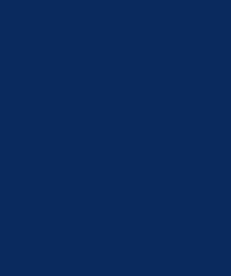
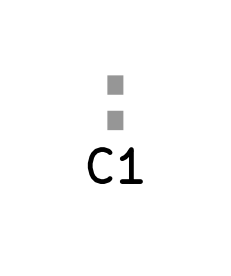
C1: none -> (115, 102)

